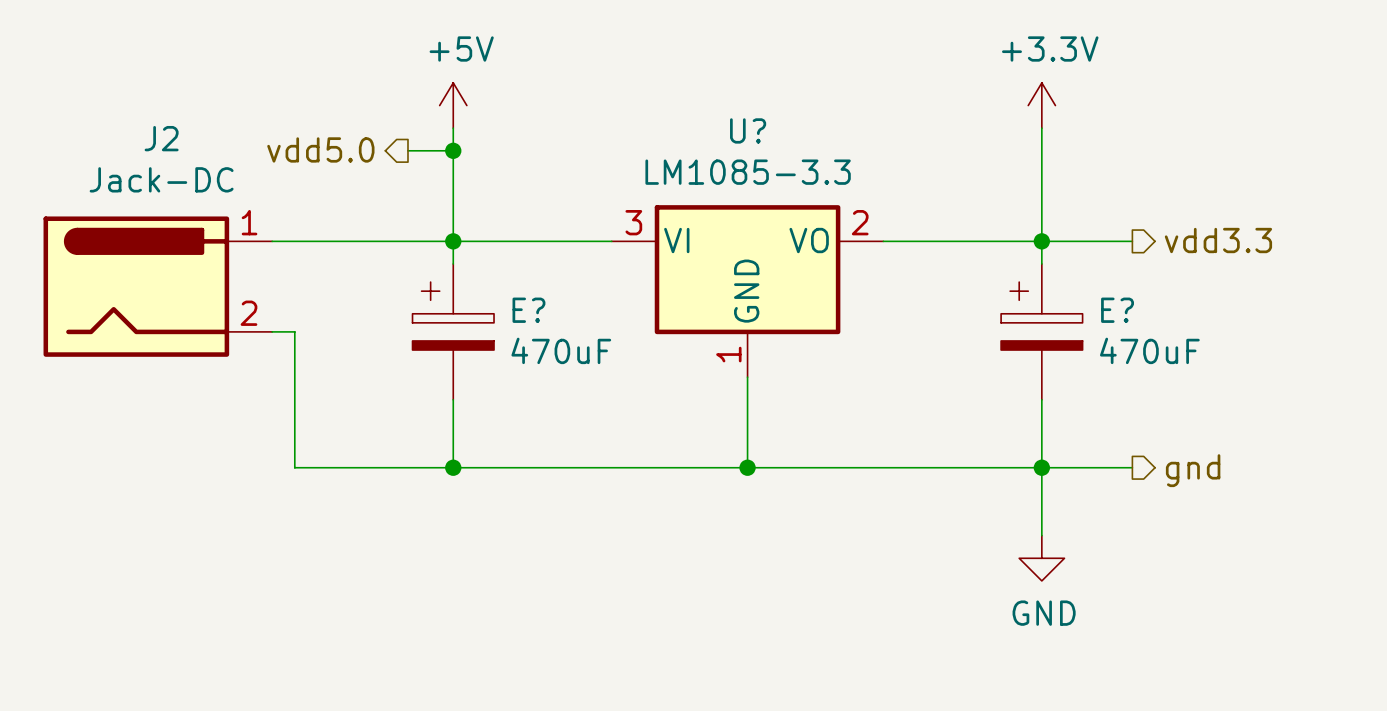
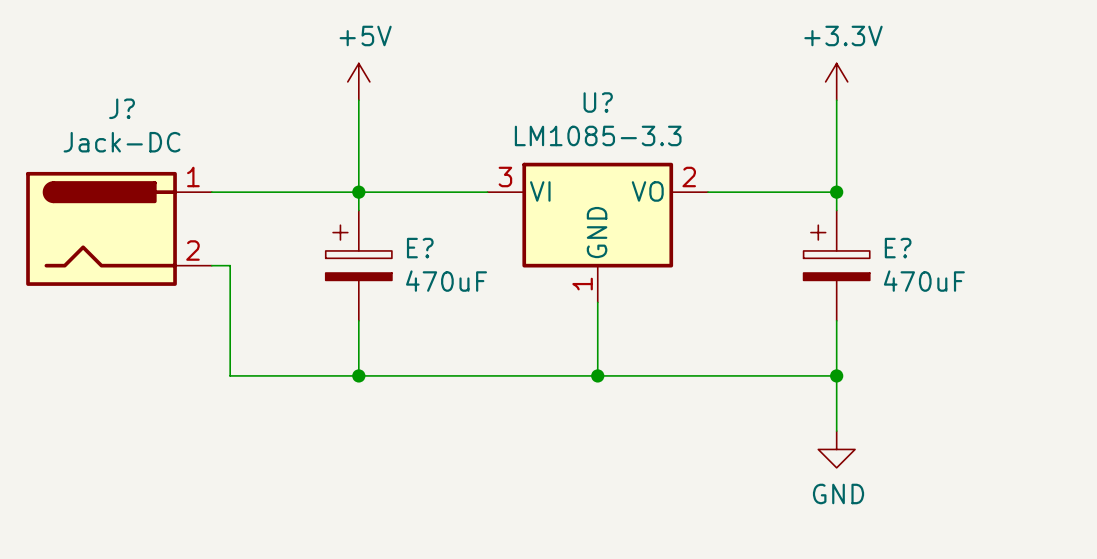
J2 name: J2 (161, 138) -> J? (122, 108)
hierarchical label: vdd5.0 (320, 149) -> none
wire: (407, 150) (453, 150) -> none
junction: (453, 150) -> none
hierarchical label: vdd3.3 (1218, 240) -> none
wire: (1041, 241) (1132, 241) -> none
wire: (1041, 467) (1132, 467) -> none
hierarchical label: gnd (1193, 470) -> none

